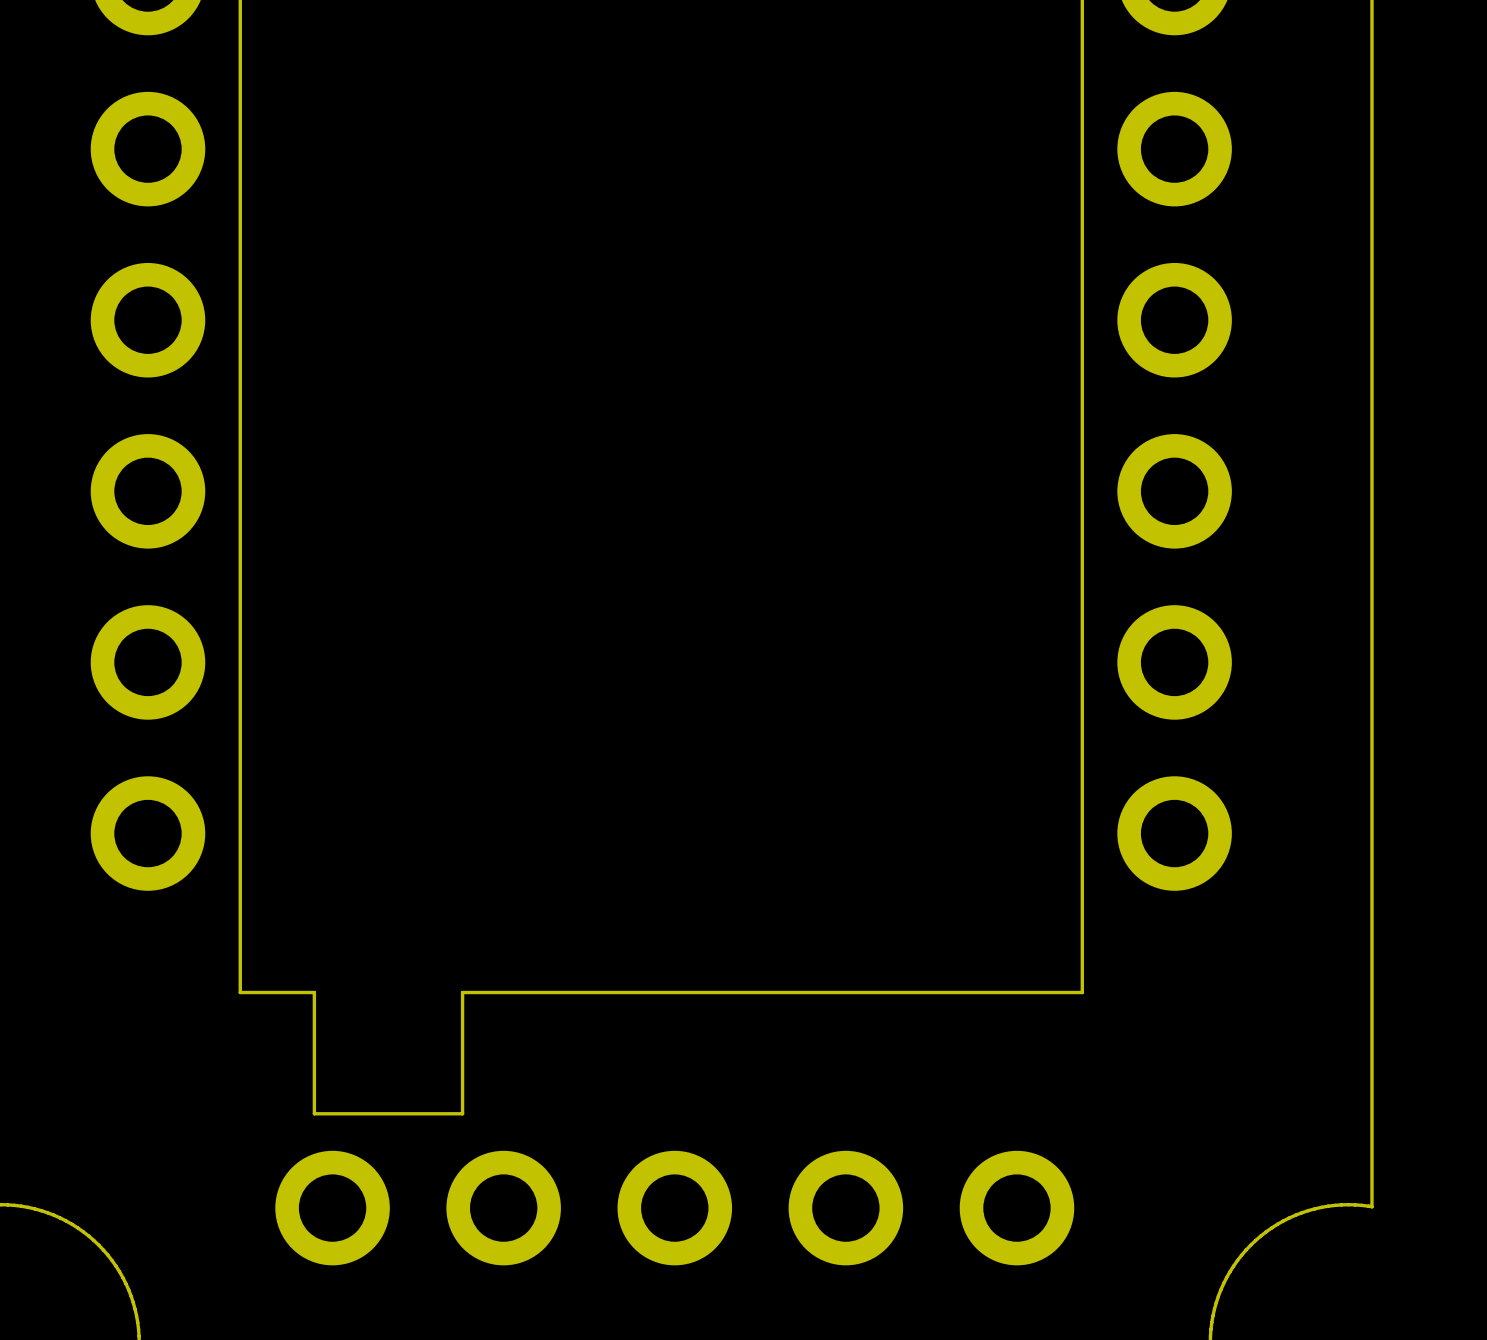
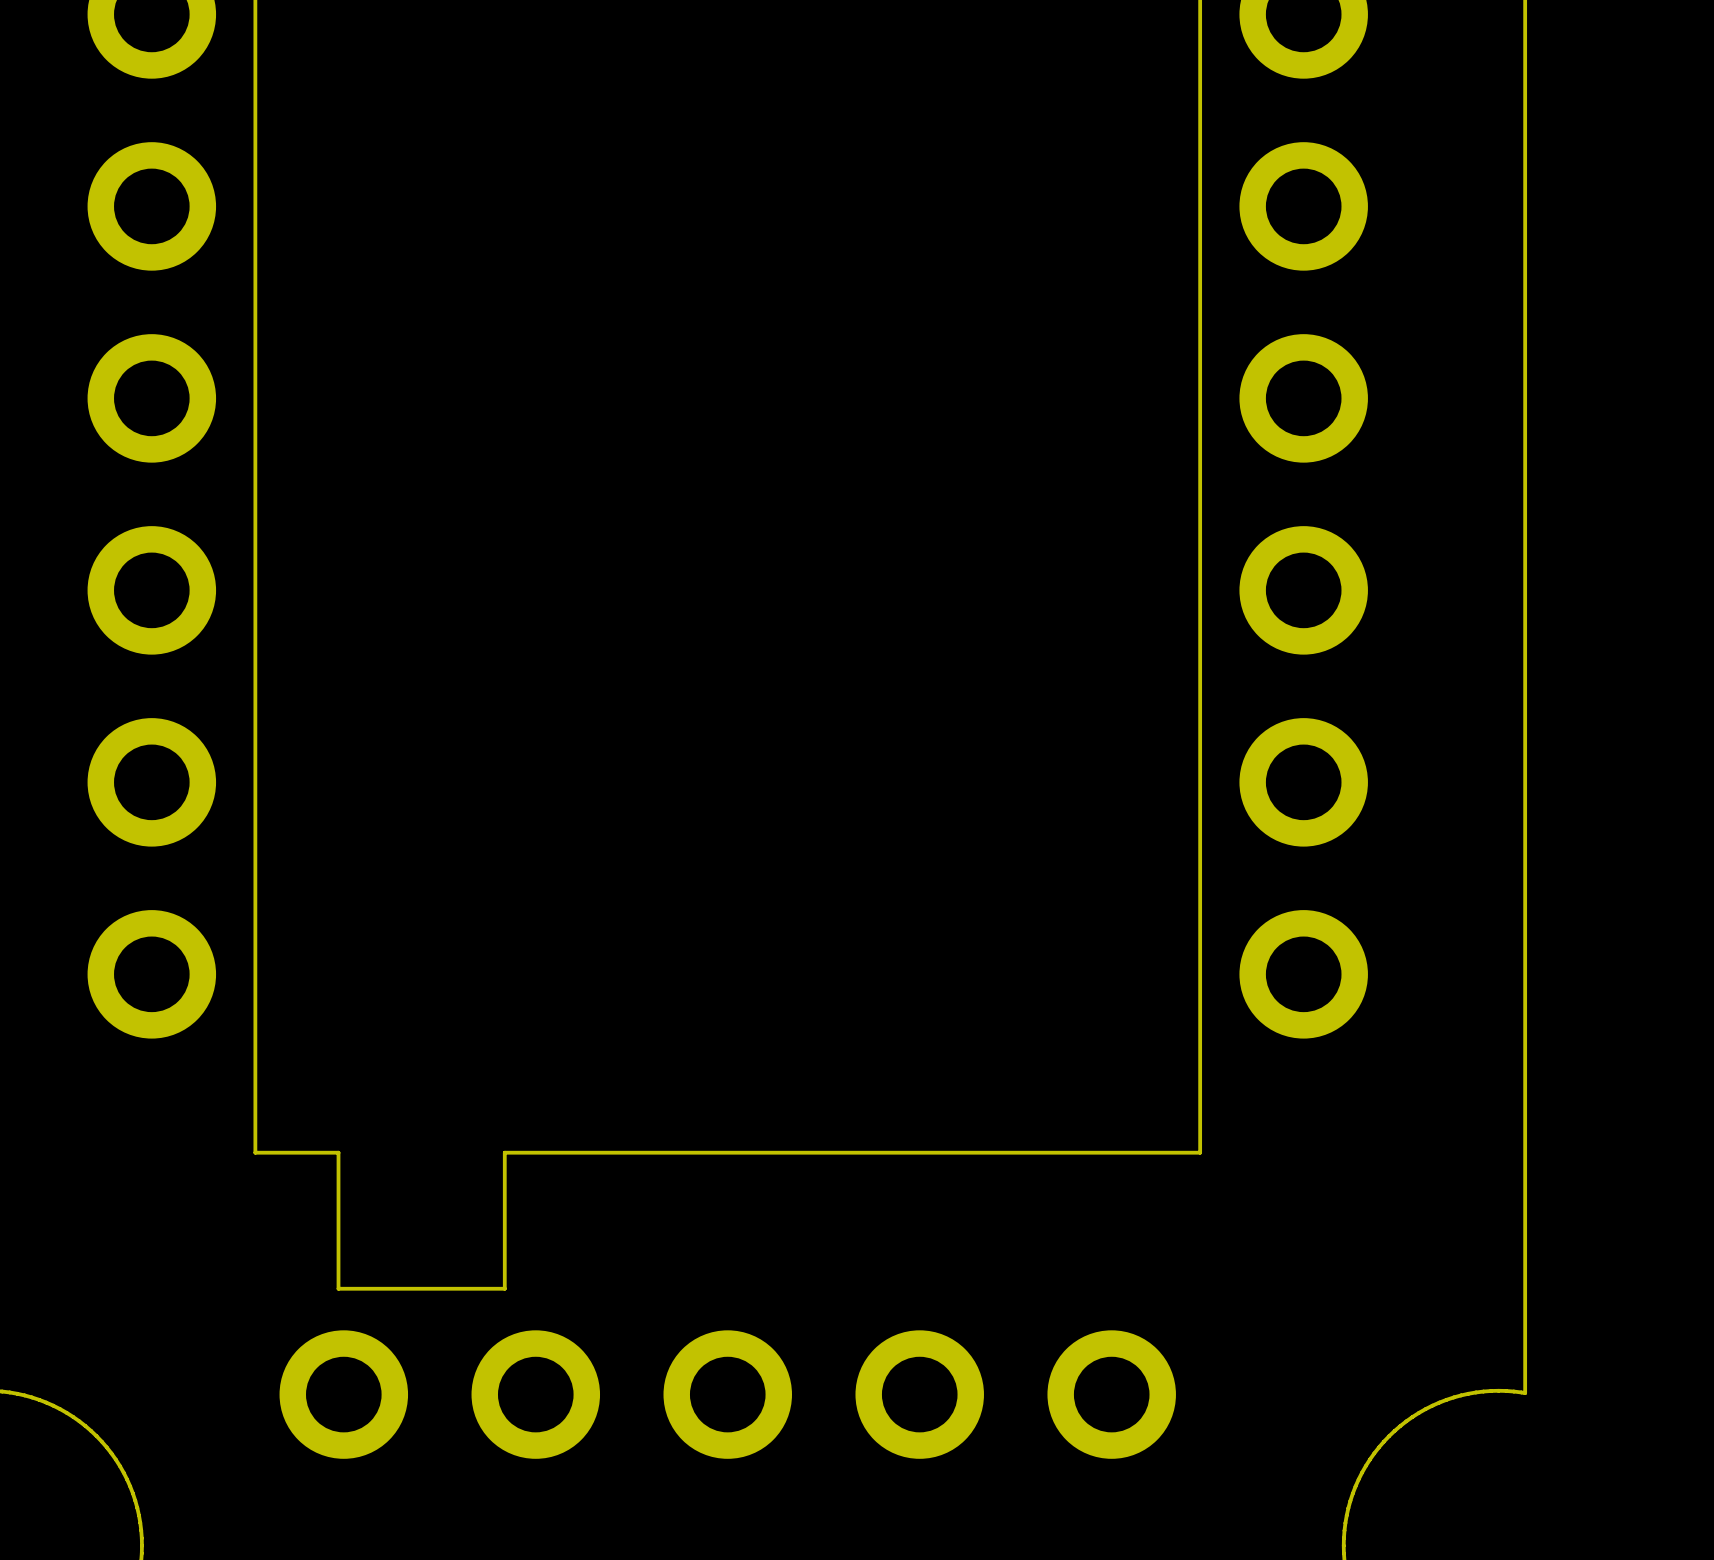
part position: (674, 1208) -> (727, 1394)

